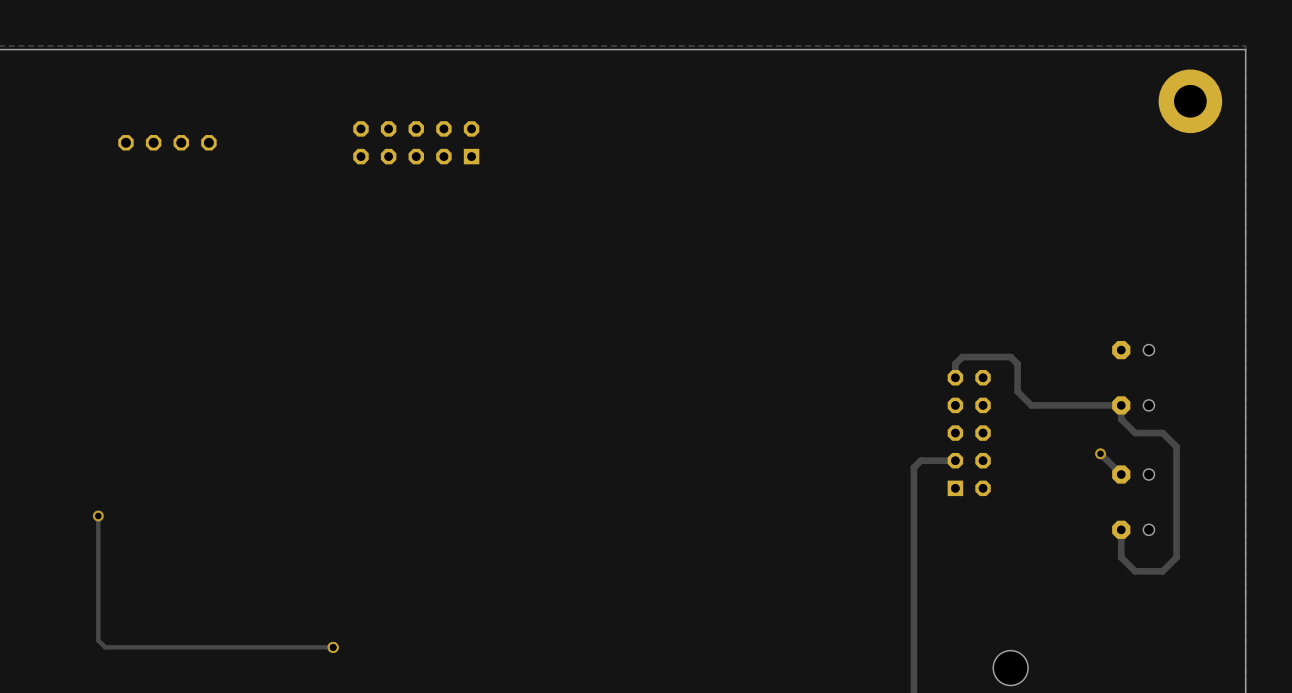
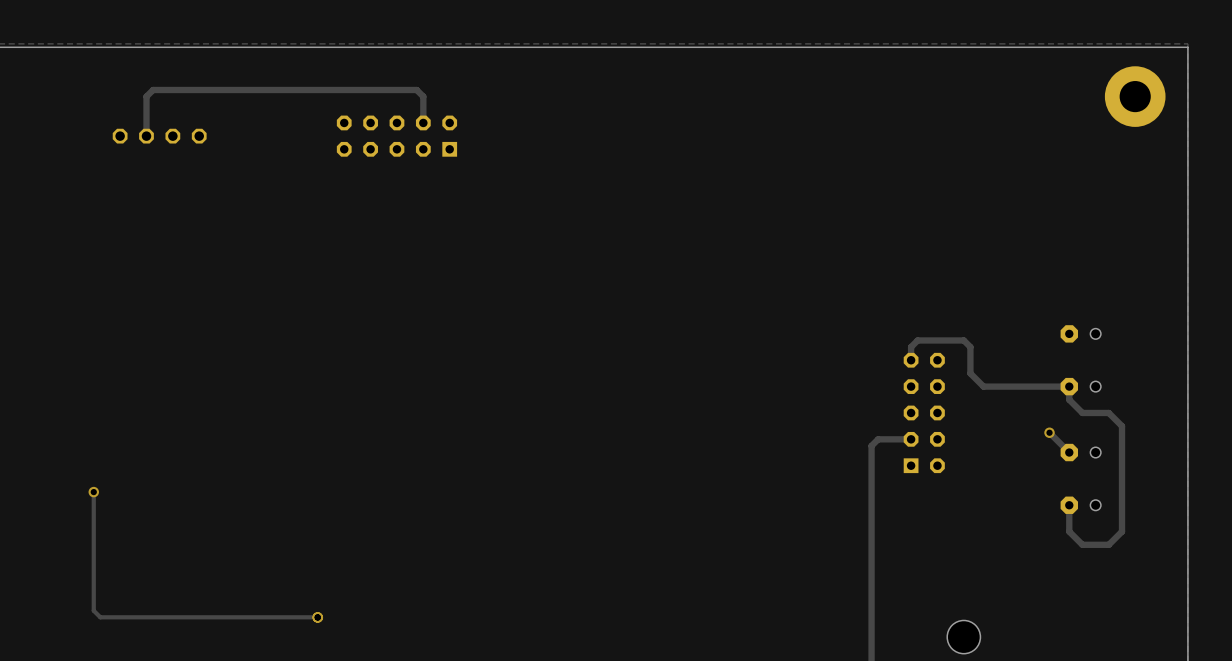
track: none -> (423, 122) (423, 96) (416, 90) (153, 90) (146, 96) (146, 136)

